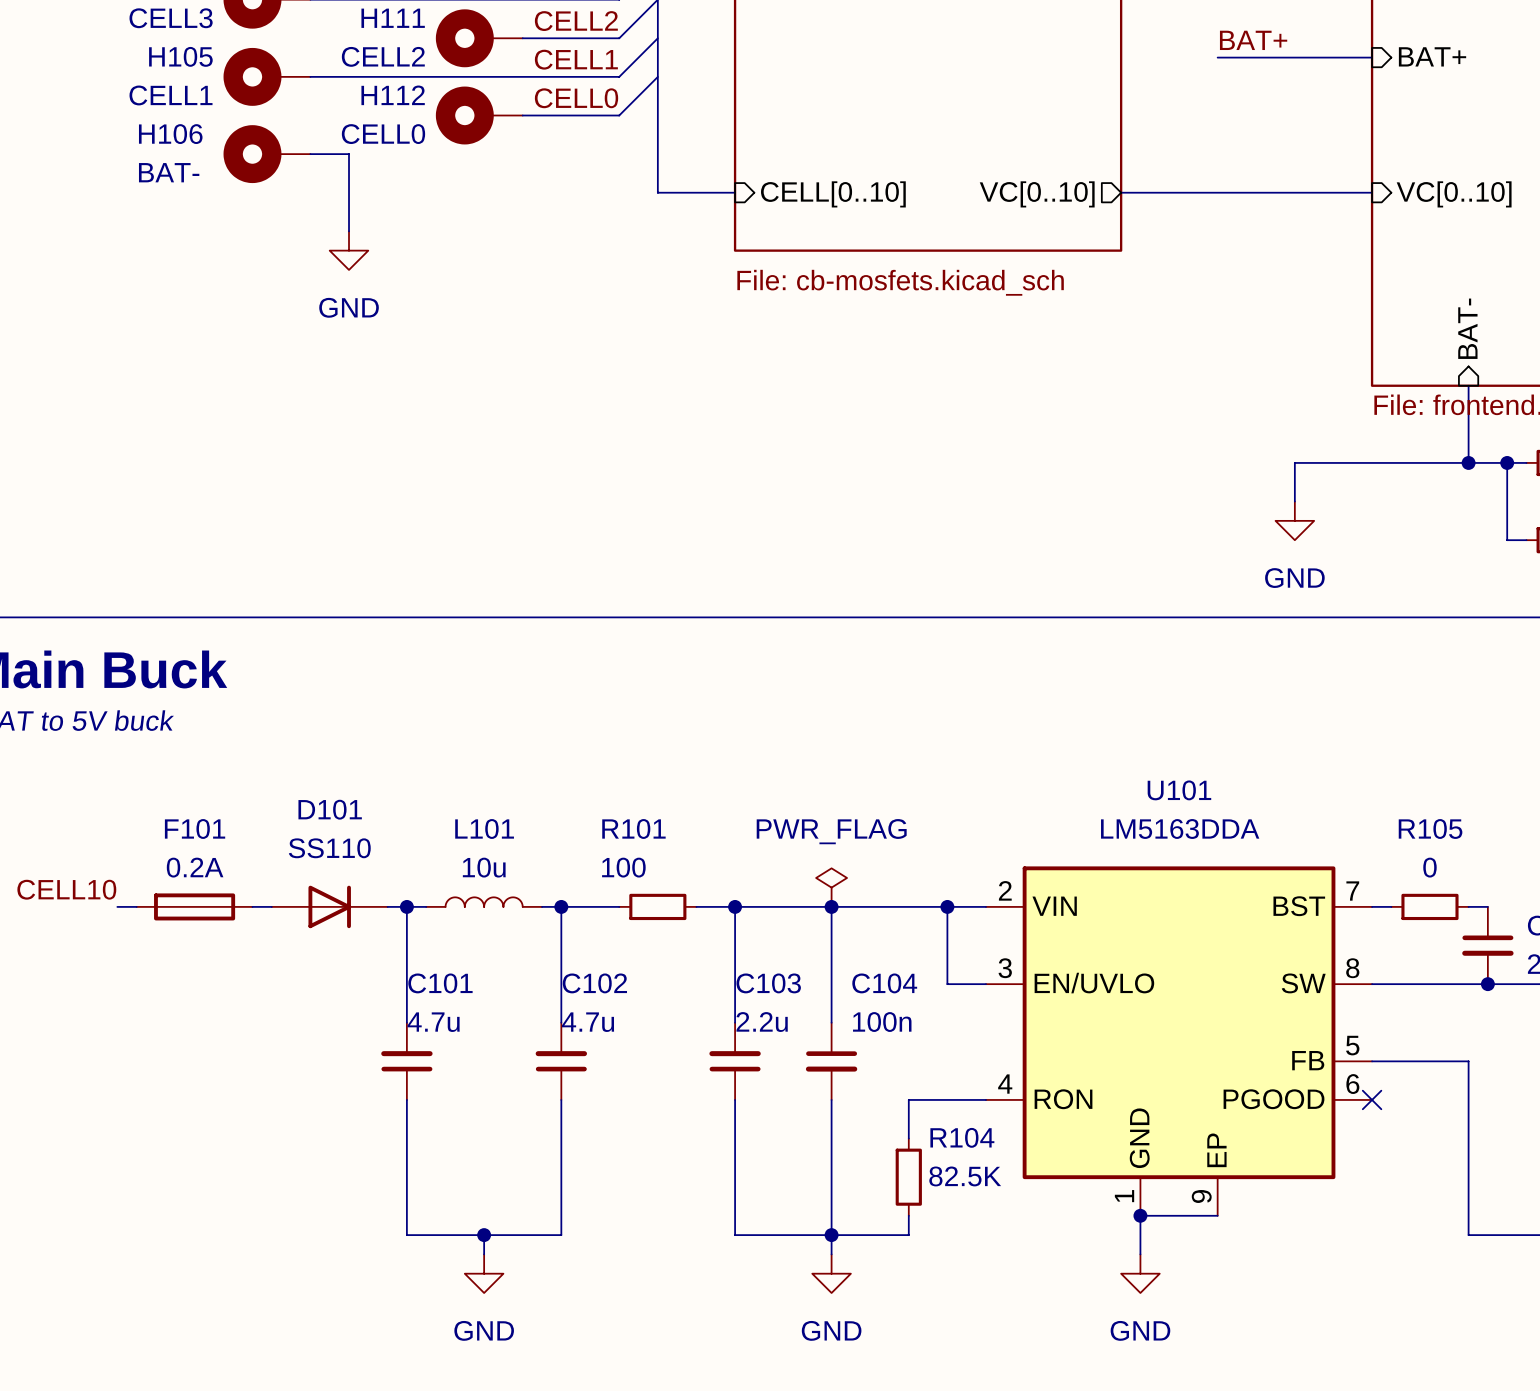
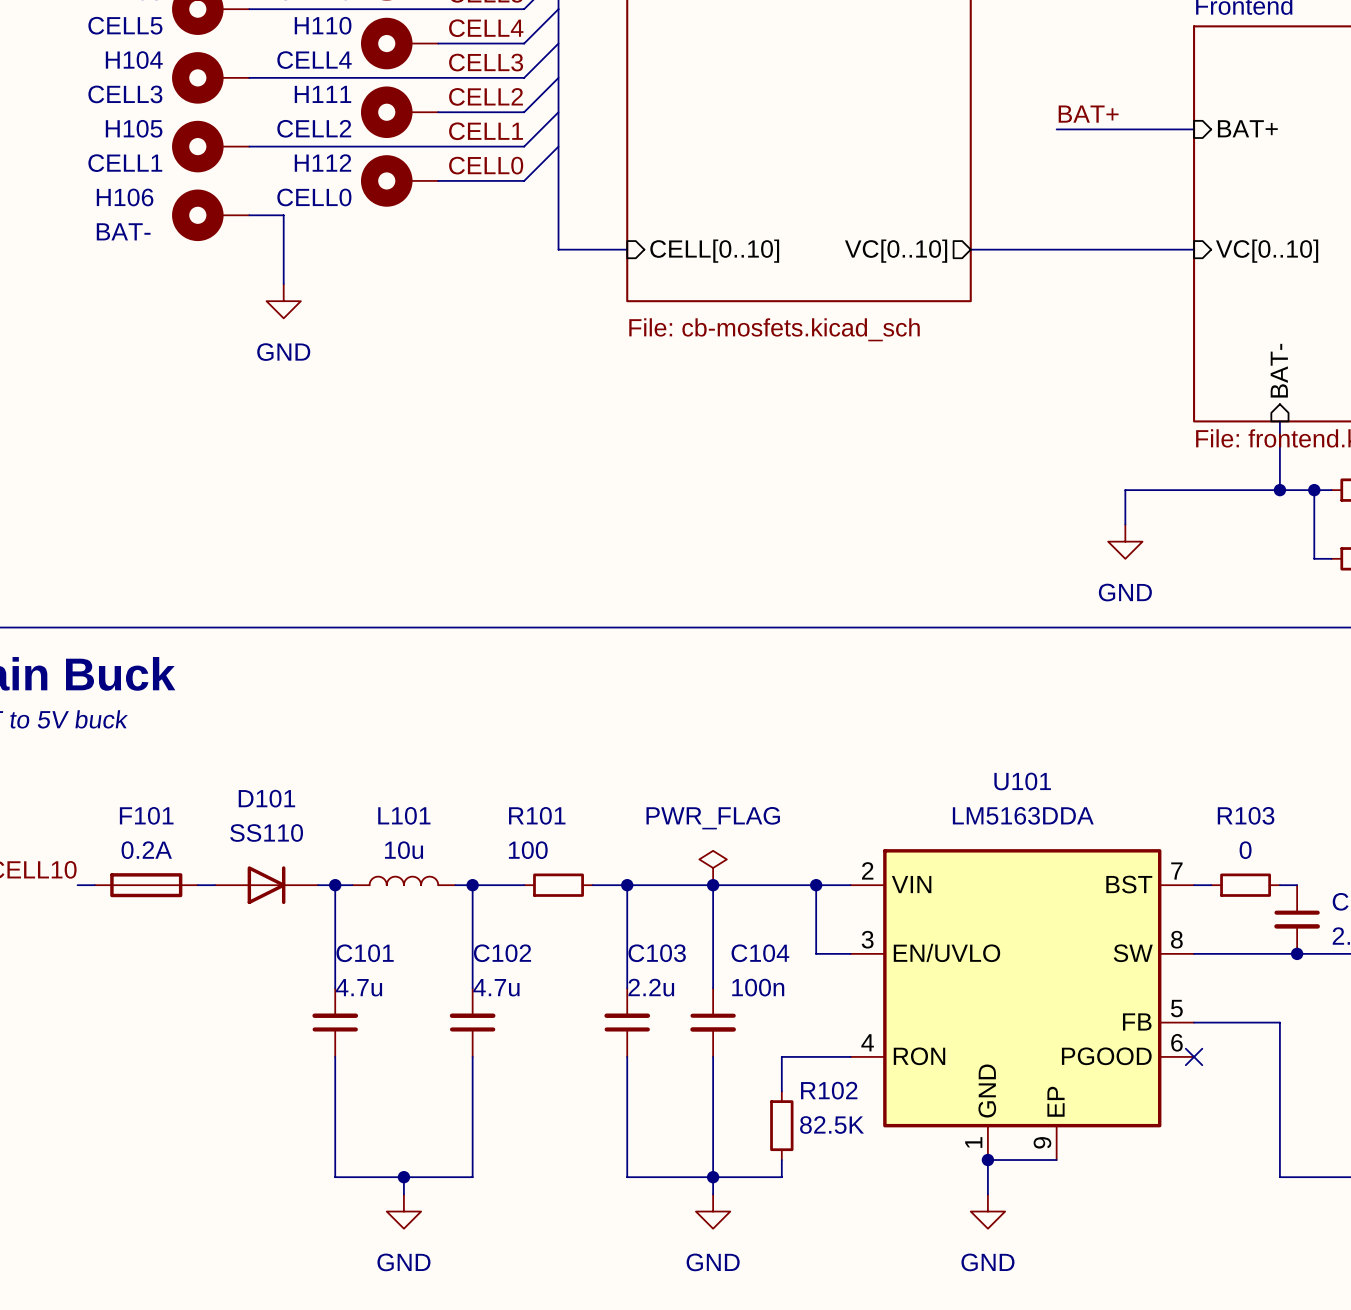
R105 name: R105 (1430, 828) -> R103 (1246, 815)
R104 name: R104 (962, 1137) -> R102 (829, 1090)

